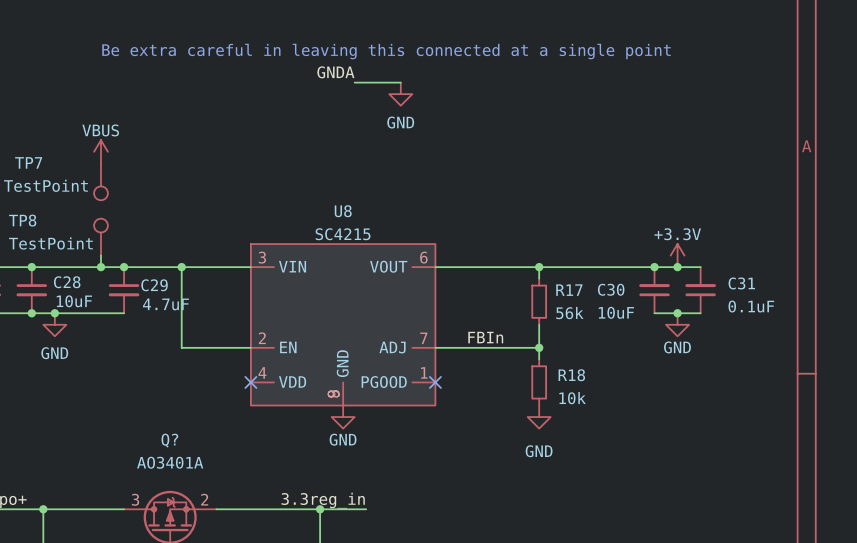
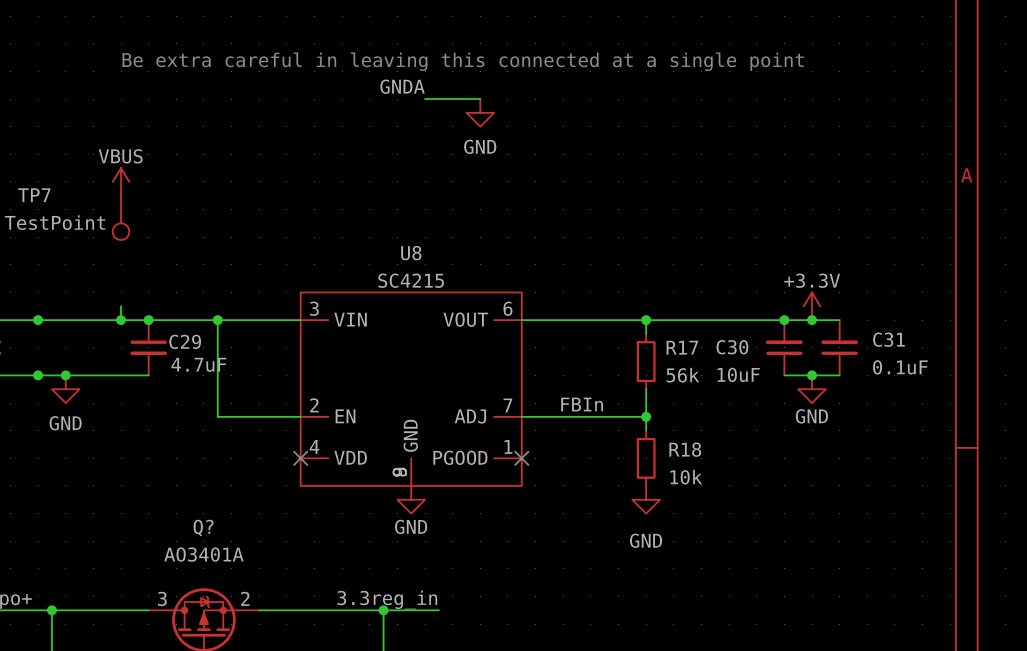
TP8: TestPoint (100, 237) -> none
C28: 10uF (31, 290) -> none

